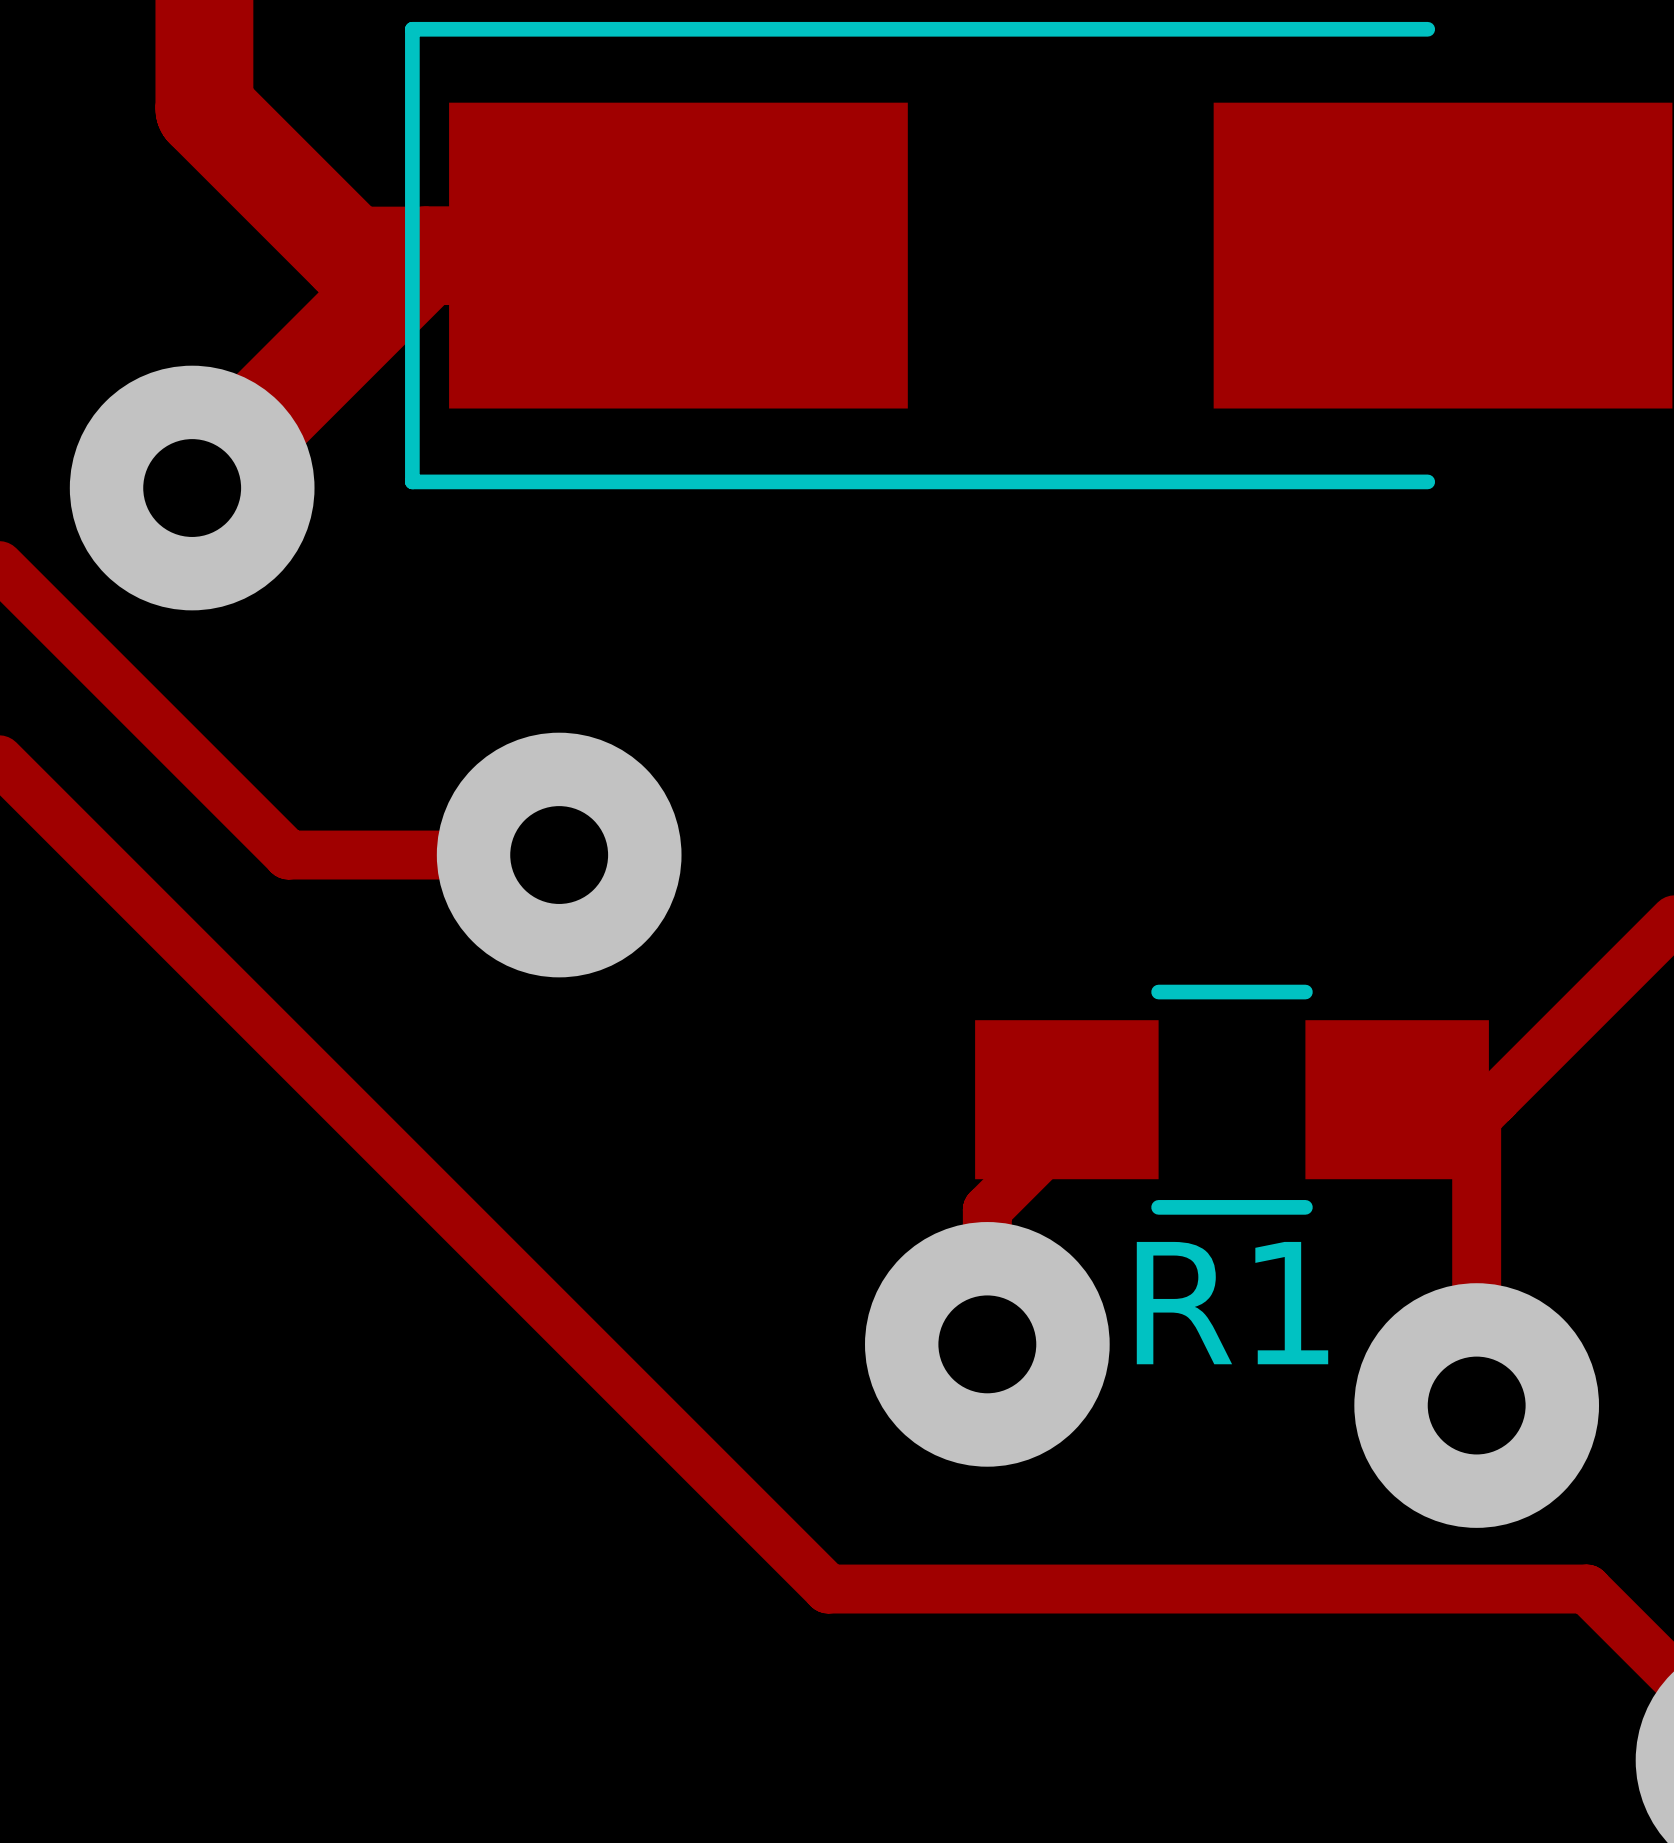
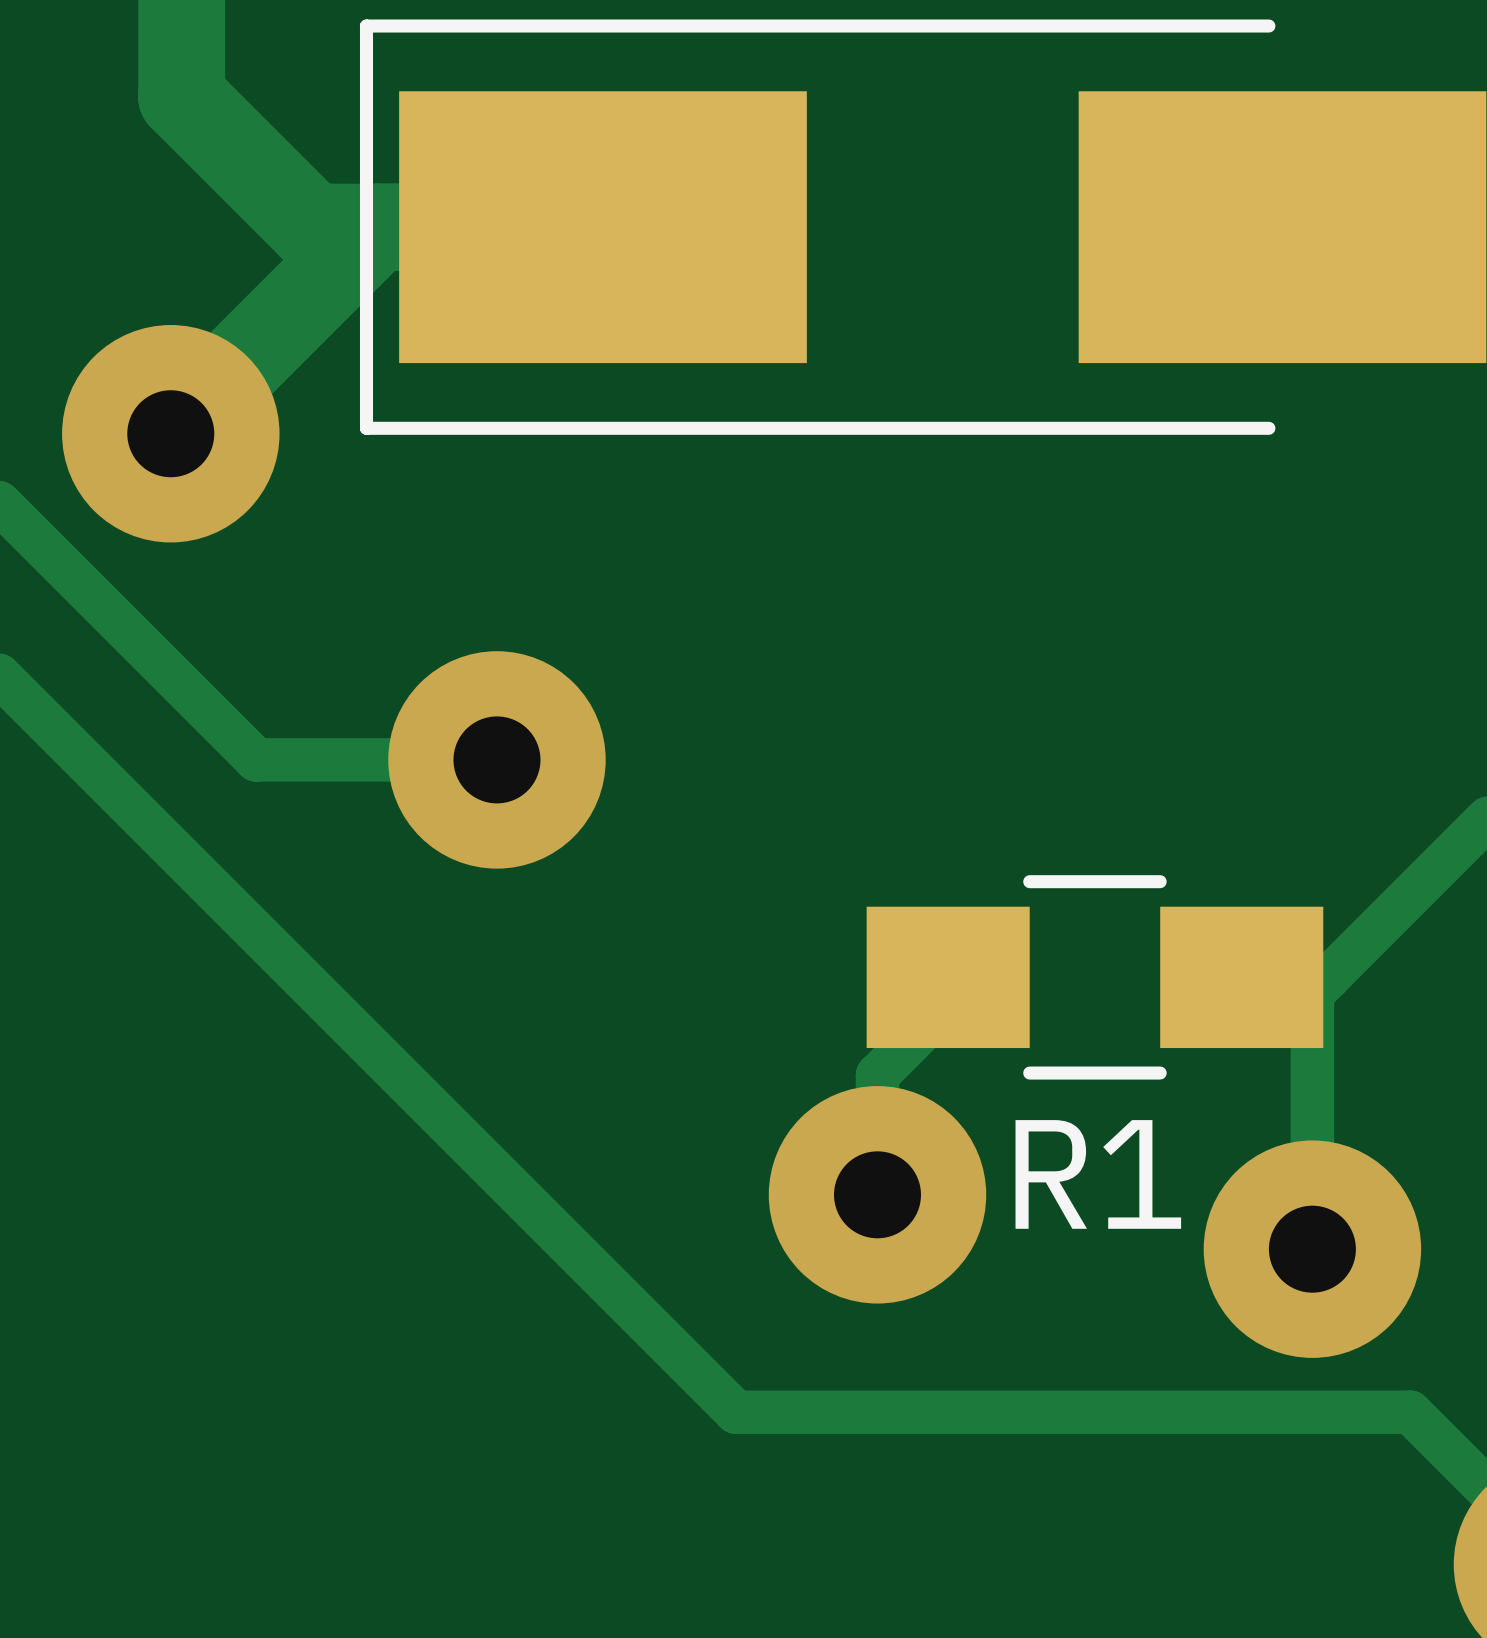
R1 name position: R1 (1232, 1303) -> R1 (1098, 1174)

